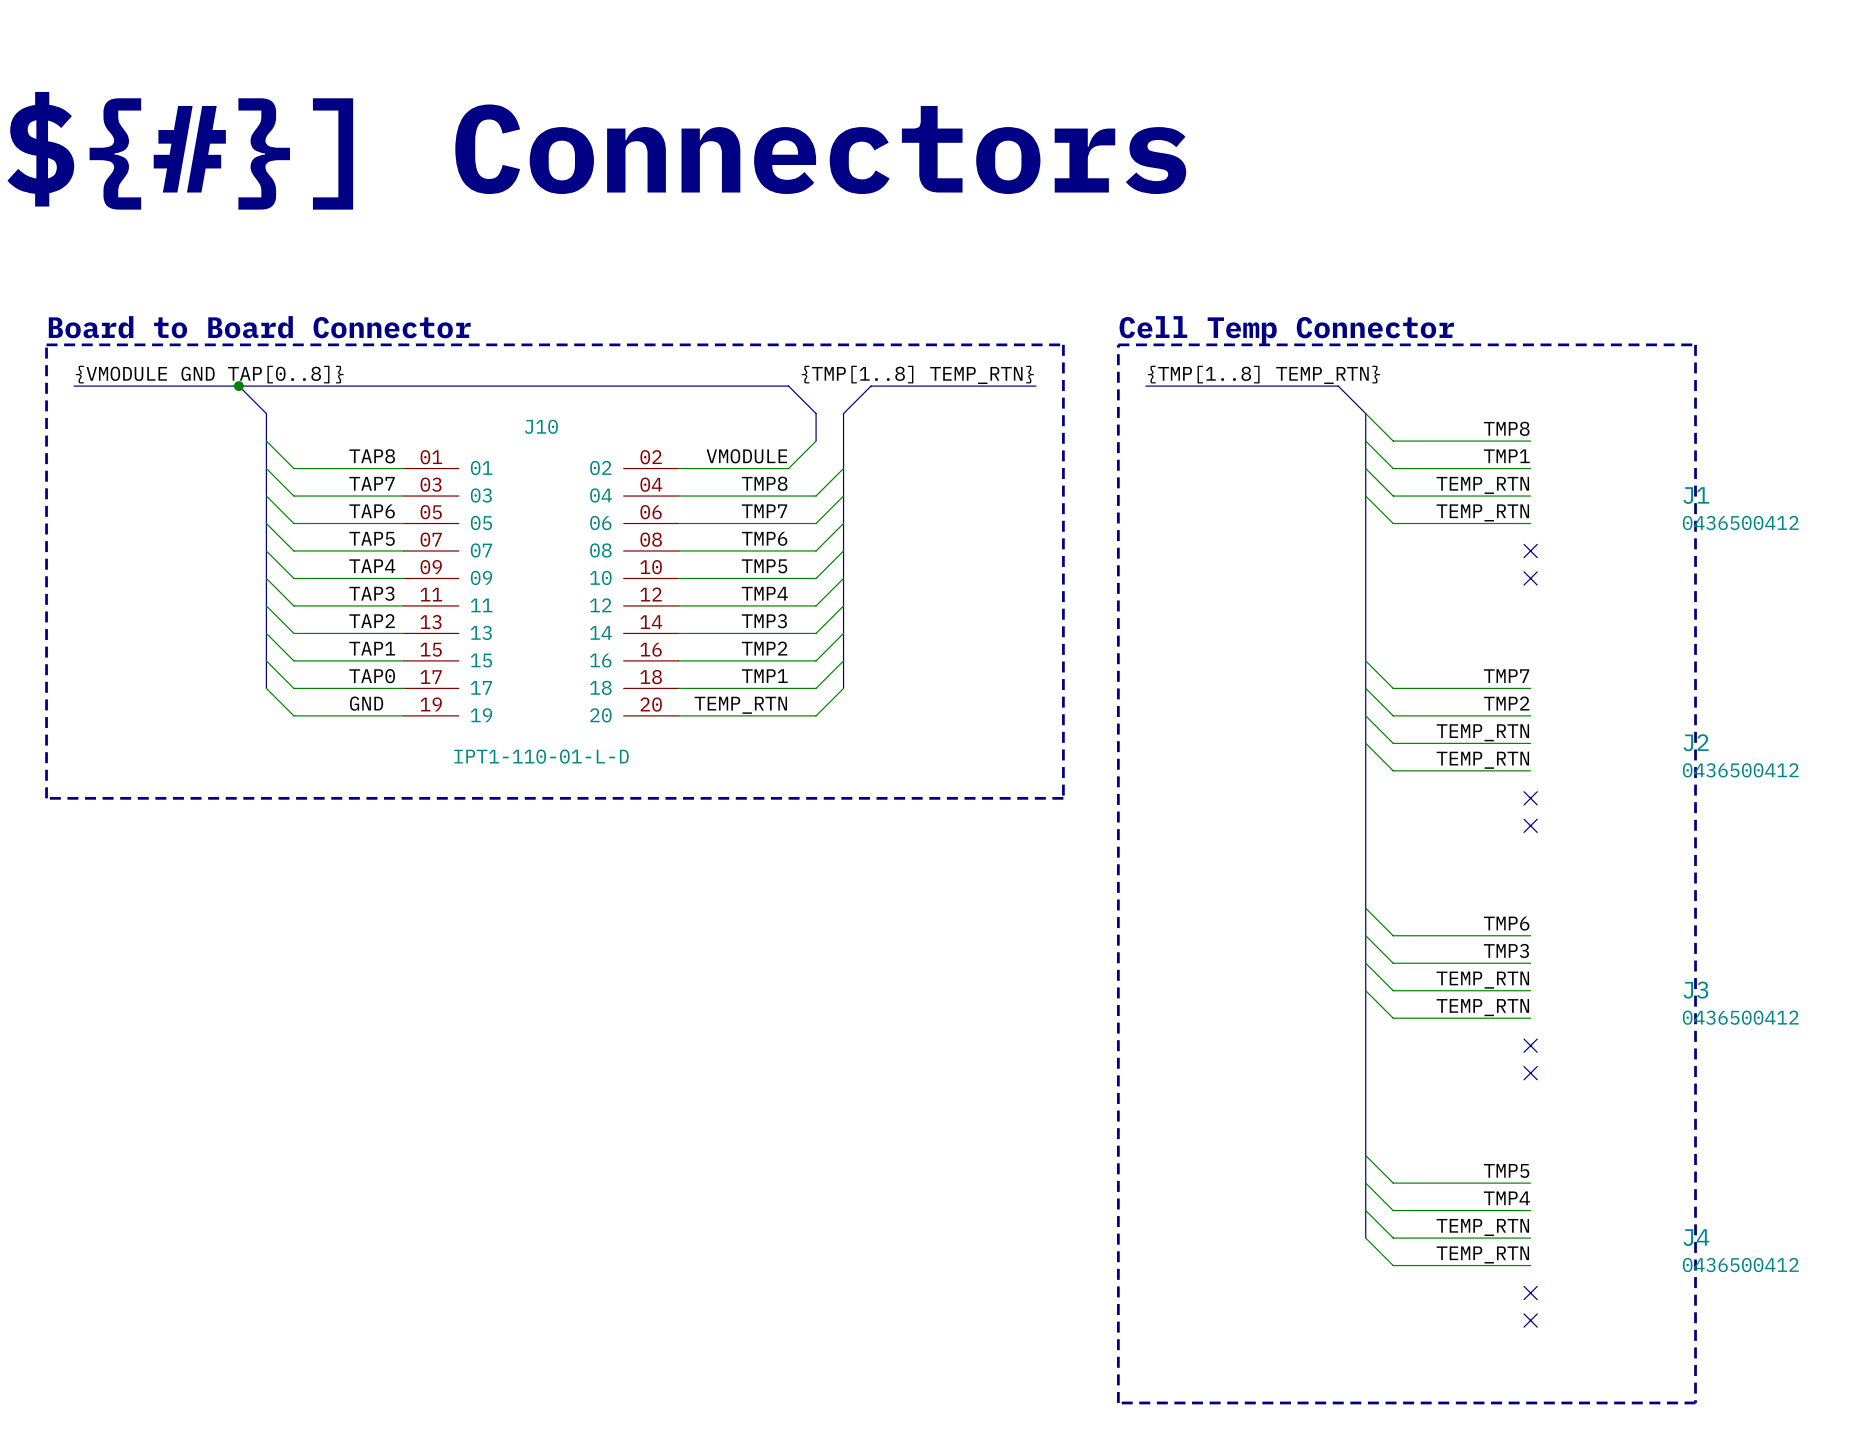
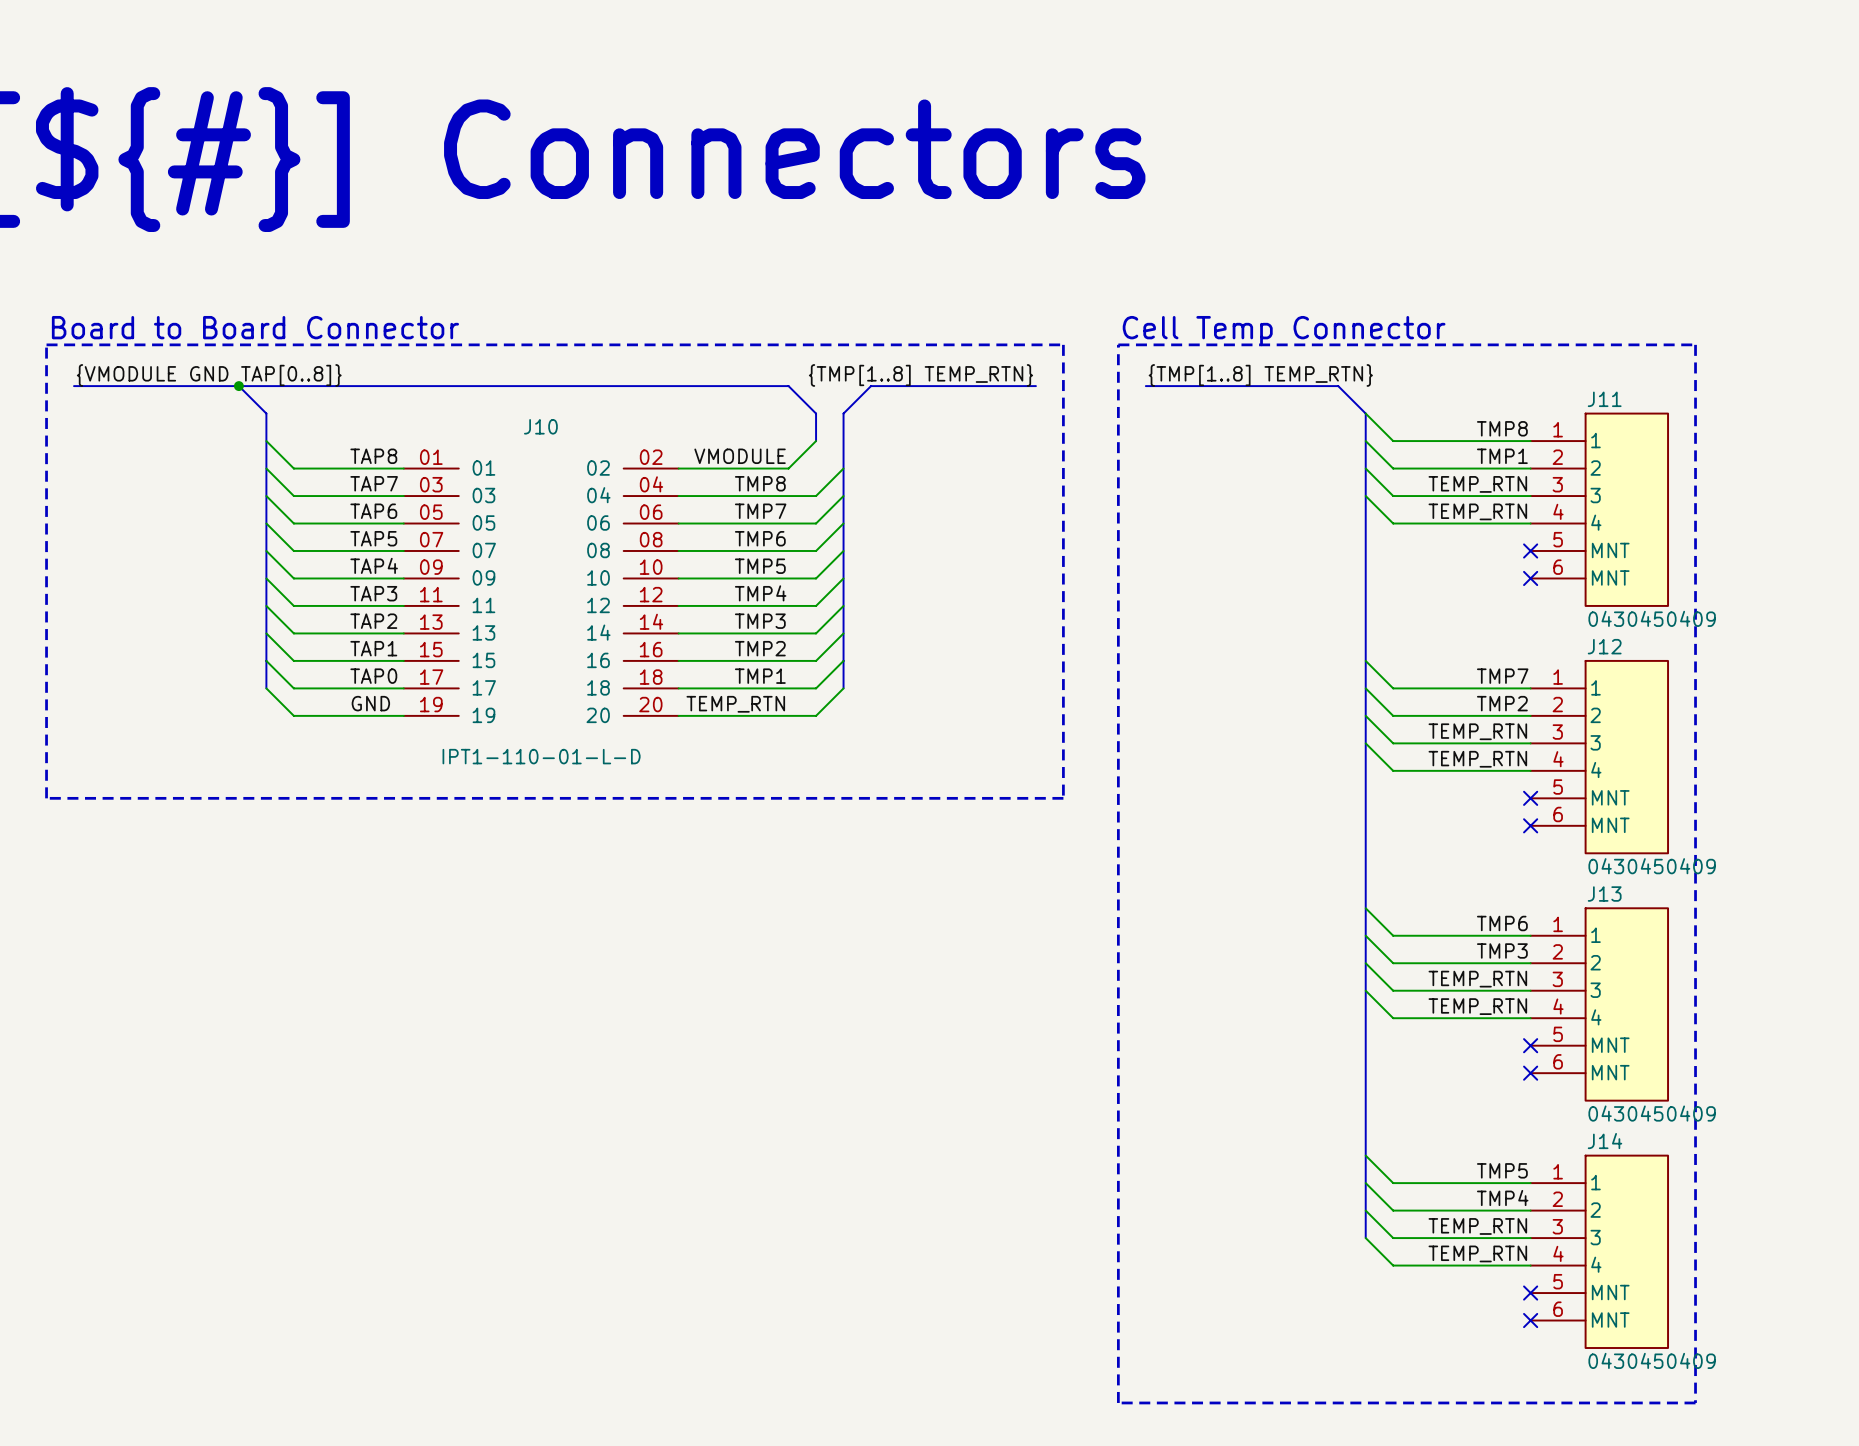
J1: 0436500412 (1740, 508) -> none
J11: none -> 0430450409 (1599, 509)
J2: 0436500412 (1740, 755) -> none
J12: none -> 0430450409 (1599, 757)
J3: 0436500412 (1740, 1003) -> none
J13: none -> 0430450409 (1599, 1004)
J4: 0436500412 (1740, 1250) -> none
J14: none -> 0430450409 (1599, 1251)

